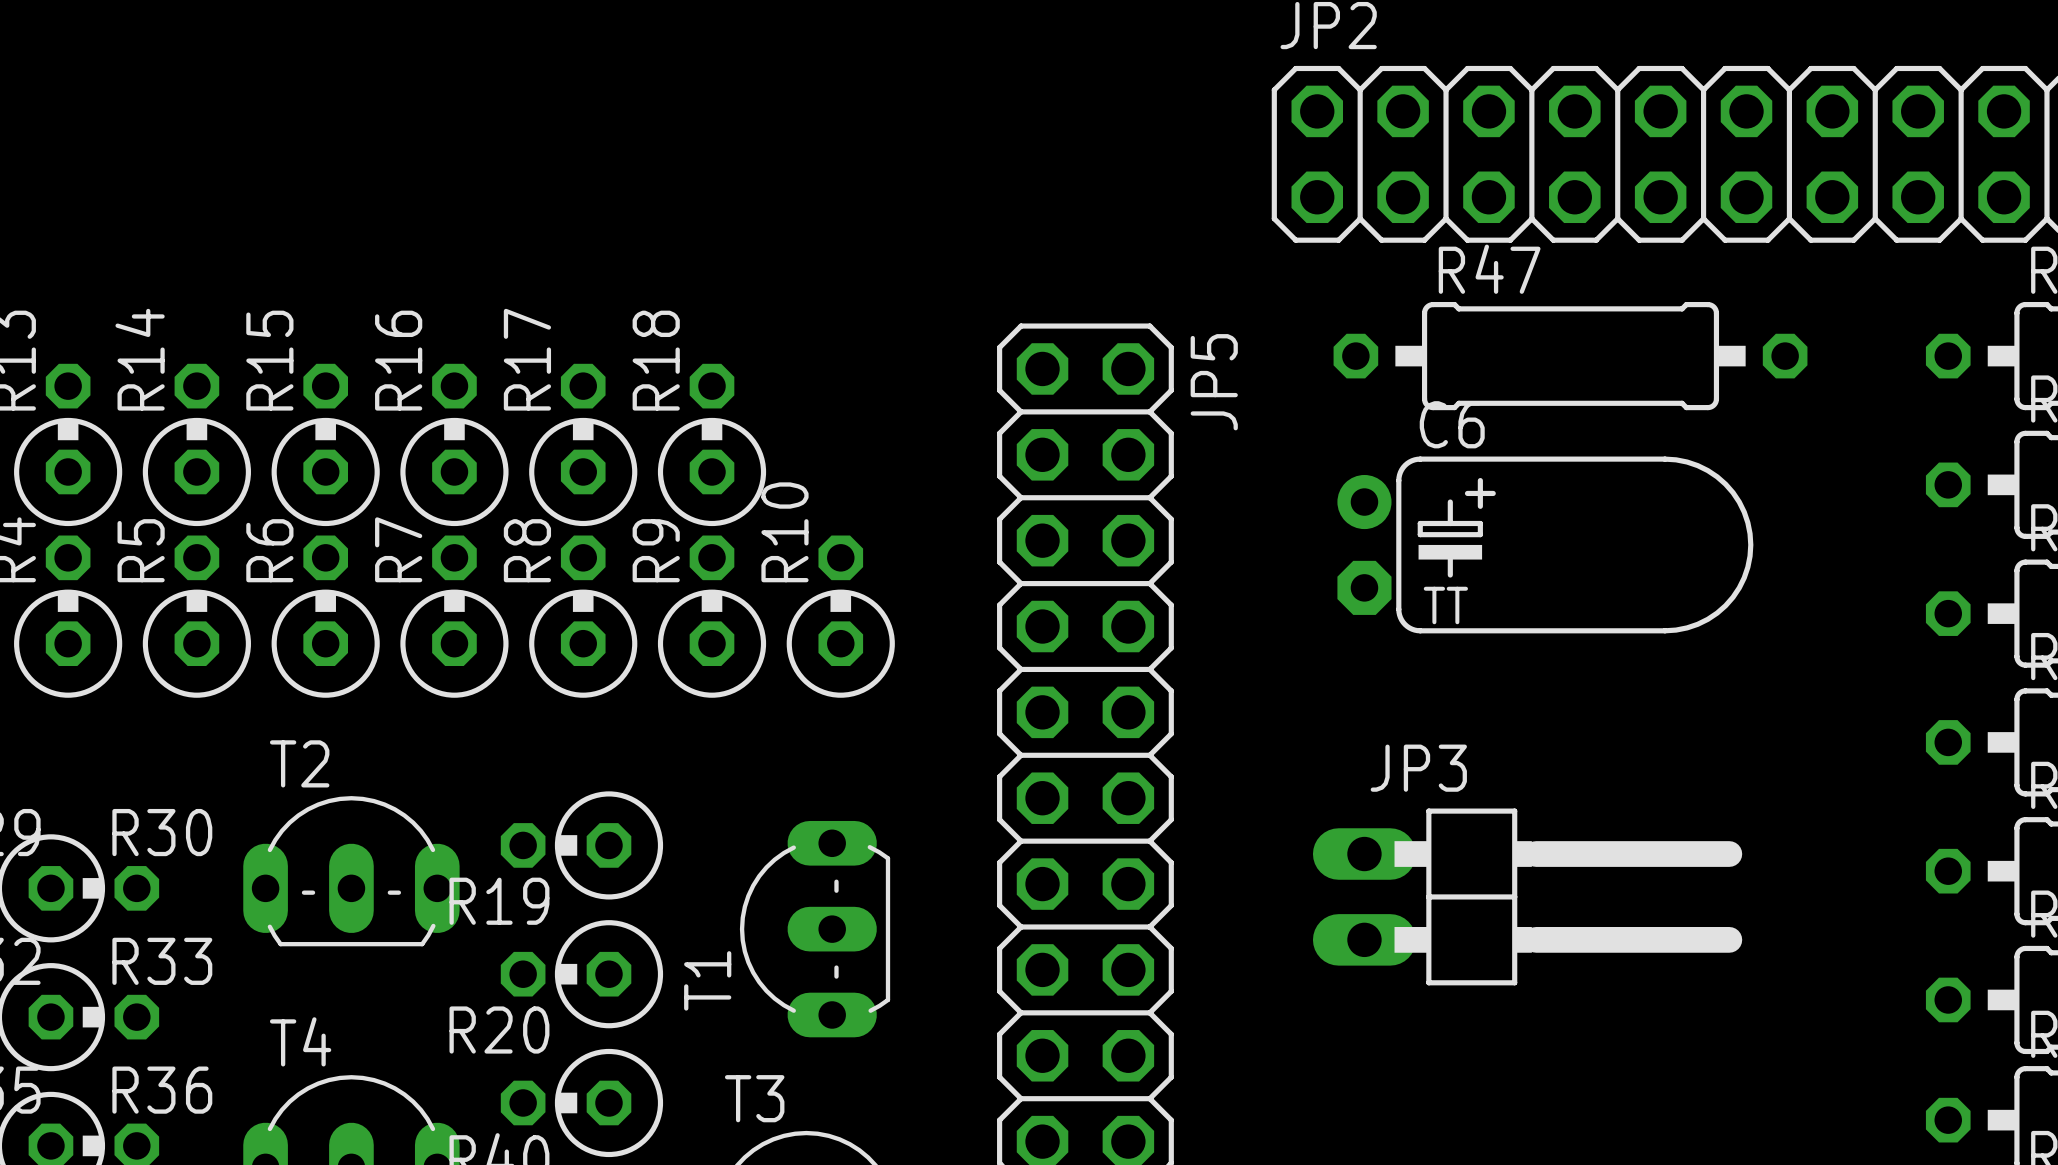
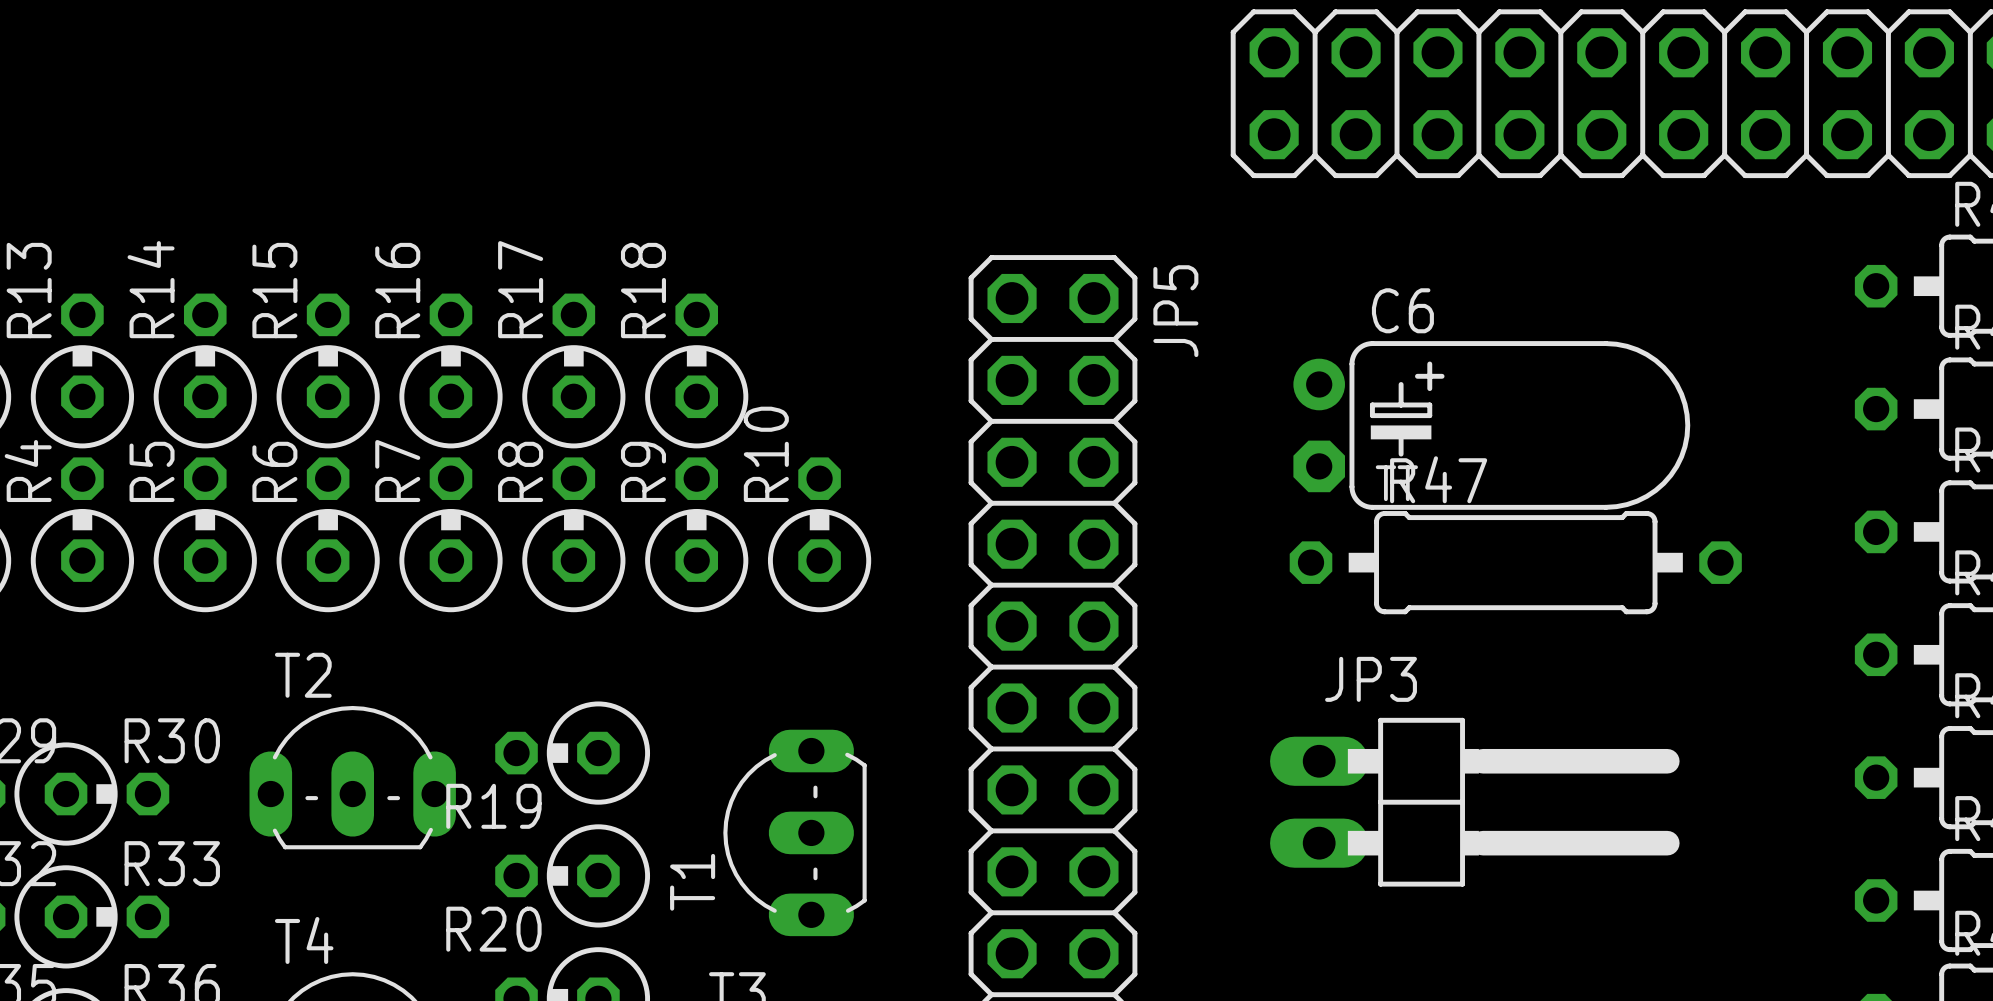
R47 position: (1570, 356) -> (1515, 562)
C6 position: (1545, 544) -> (1491, 425)

